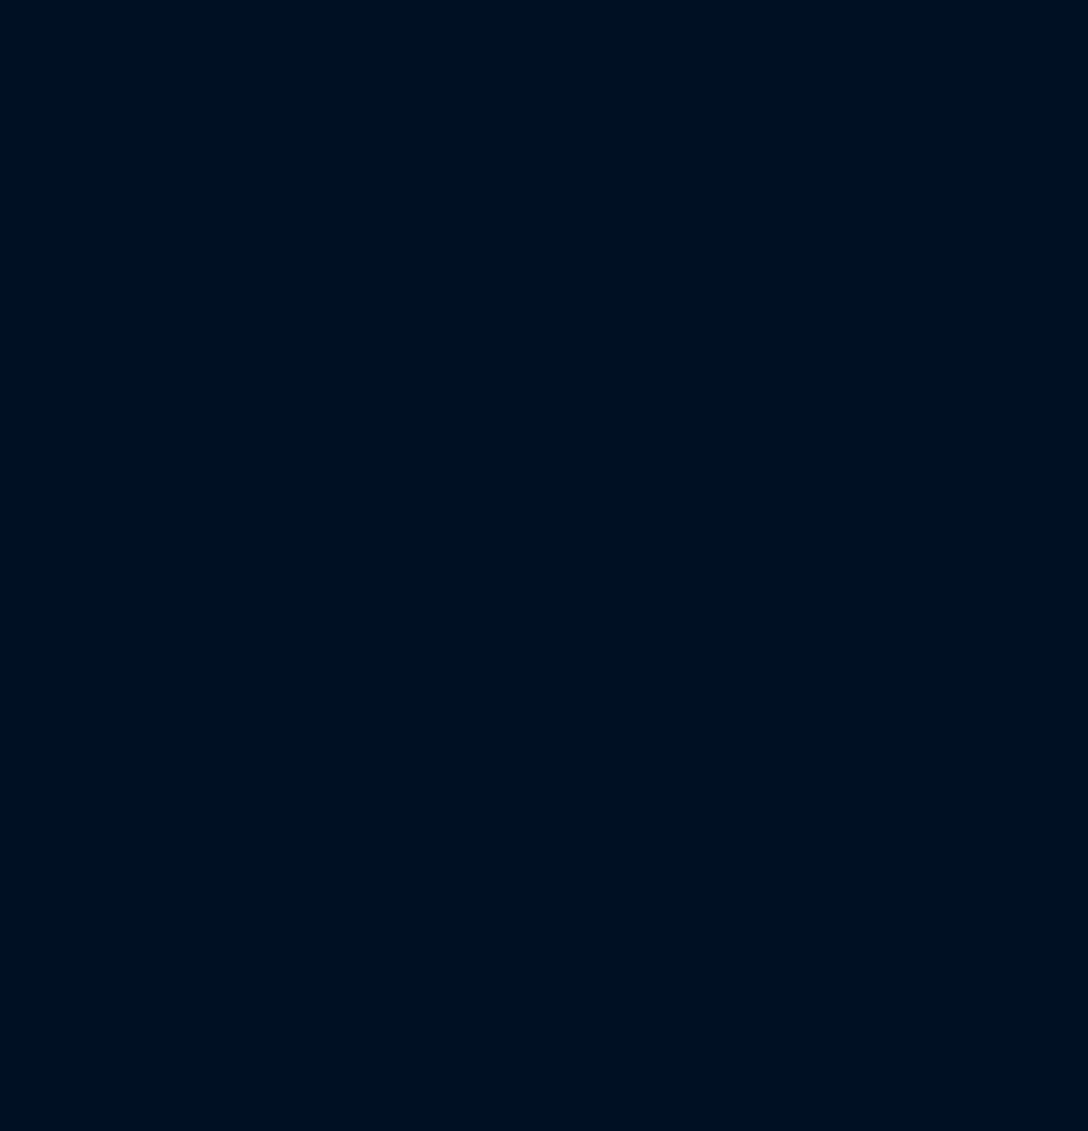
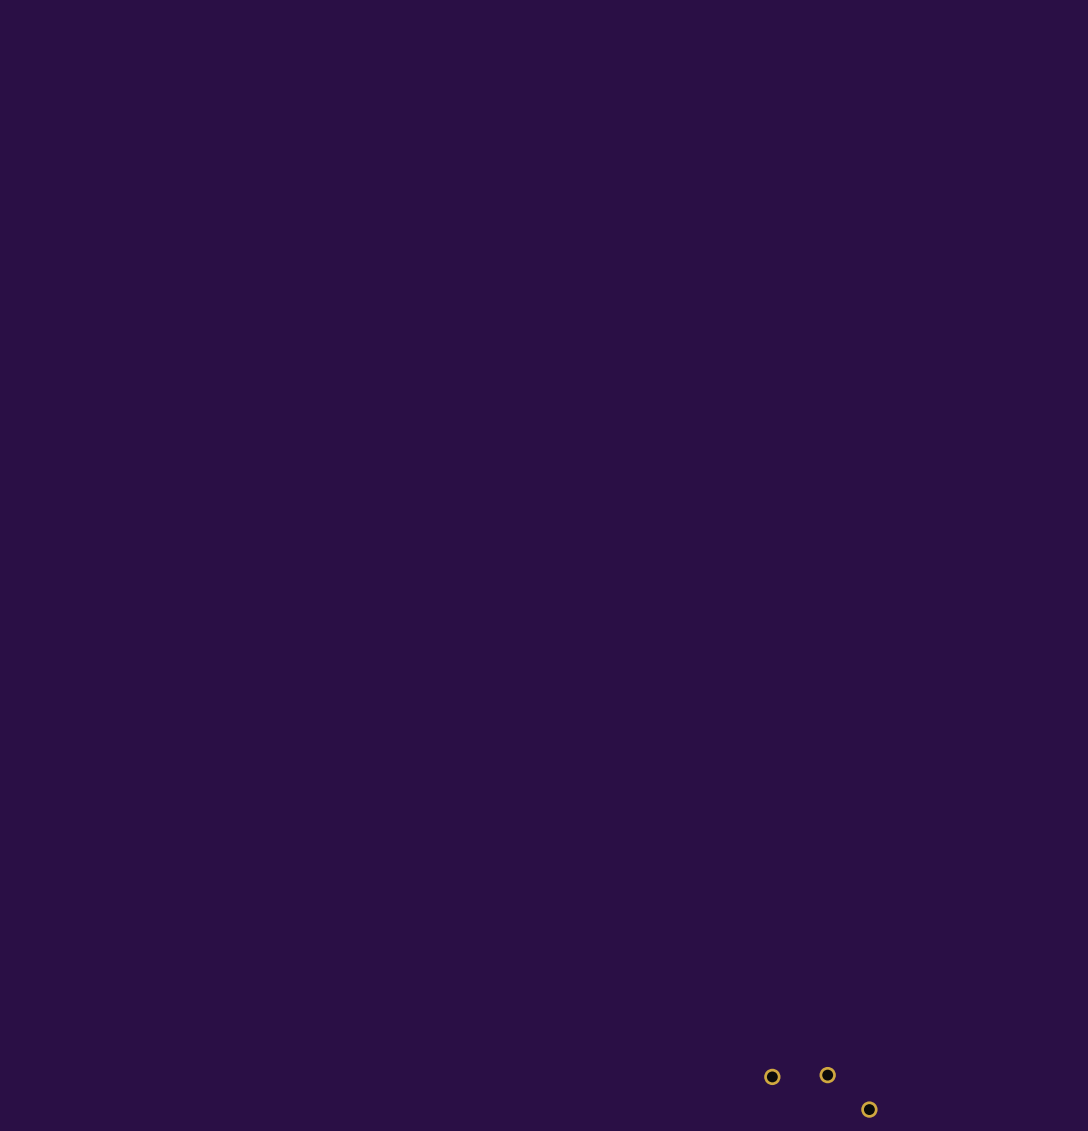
via: none -> (827, 1075)
via: none -> (772, 1076)
via: none -> (869, 1109)

